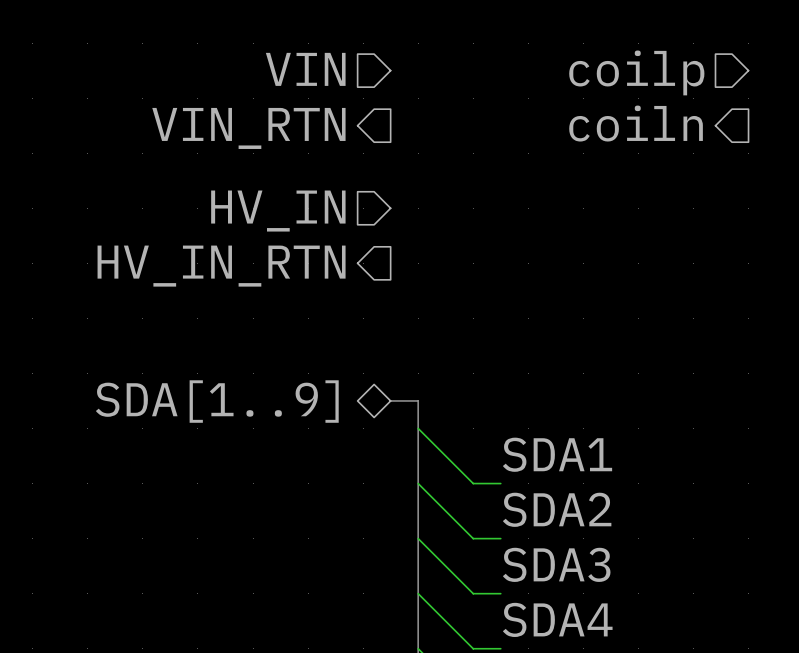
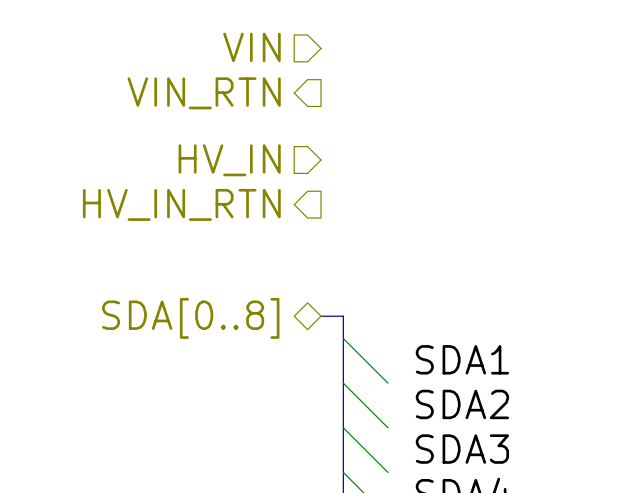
hierarchical label: coilp (636, 72) -> none
hierarchical label: coiln (636, 123) -> none
hierarchical label: SDA[1..9] (217, 401) -> SDA[0..8] (190, 318)
wire: (473, 483) (500, 483) -> none
wire: (473, 538) (500, 538) -> none
wire: (473, 593) (500, 593) -> none

